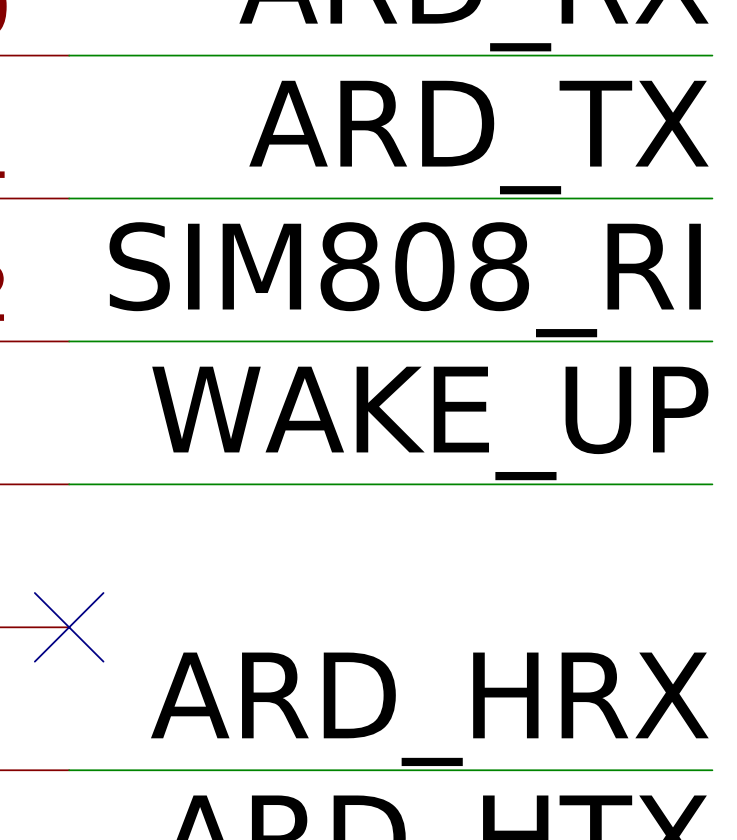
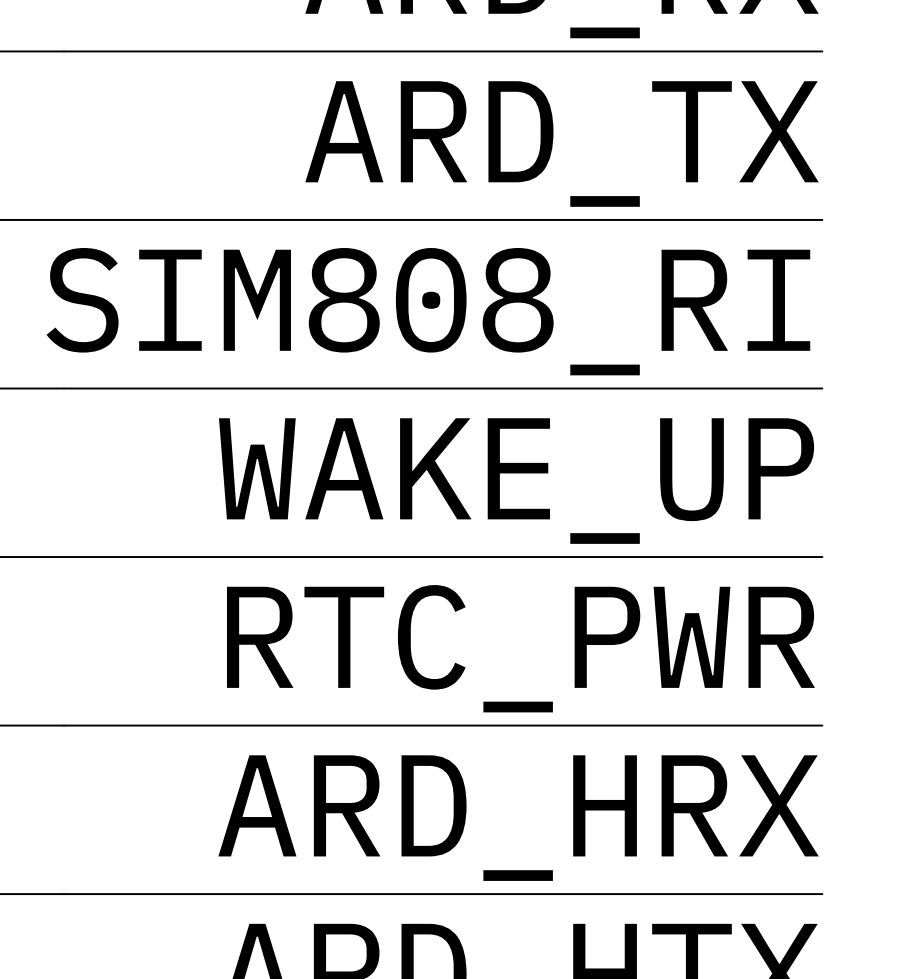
label: none -> RTC_PWR (520, 648)
wire: none -> (64, 725) (822, 725)
no-connect mark: (69, 627) -> none

